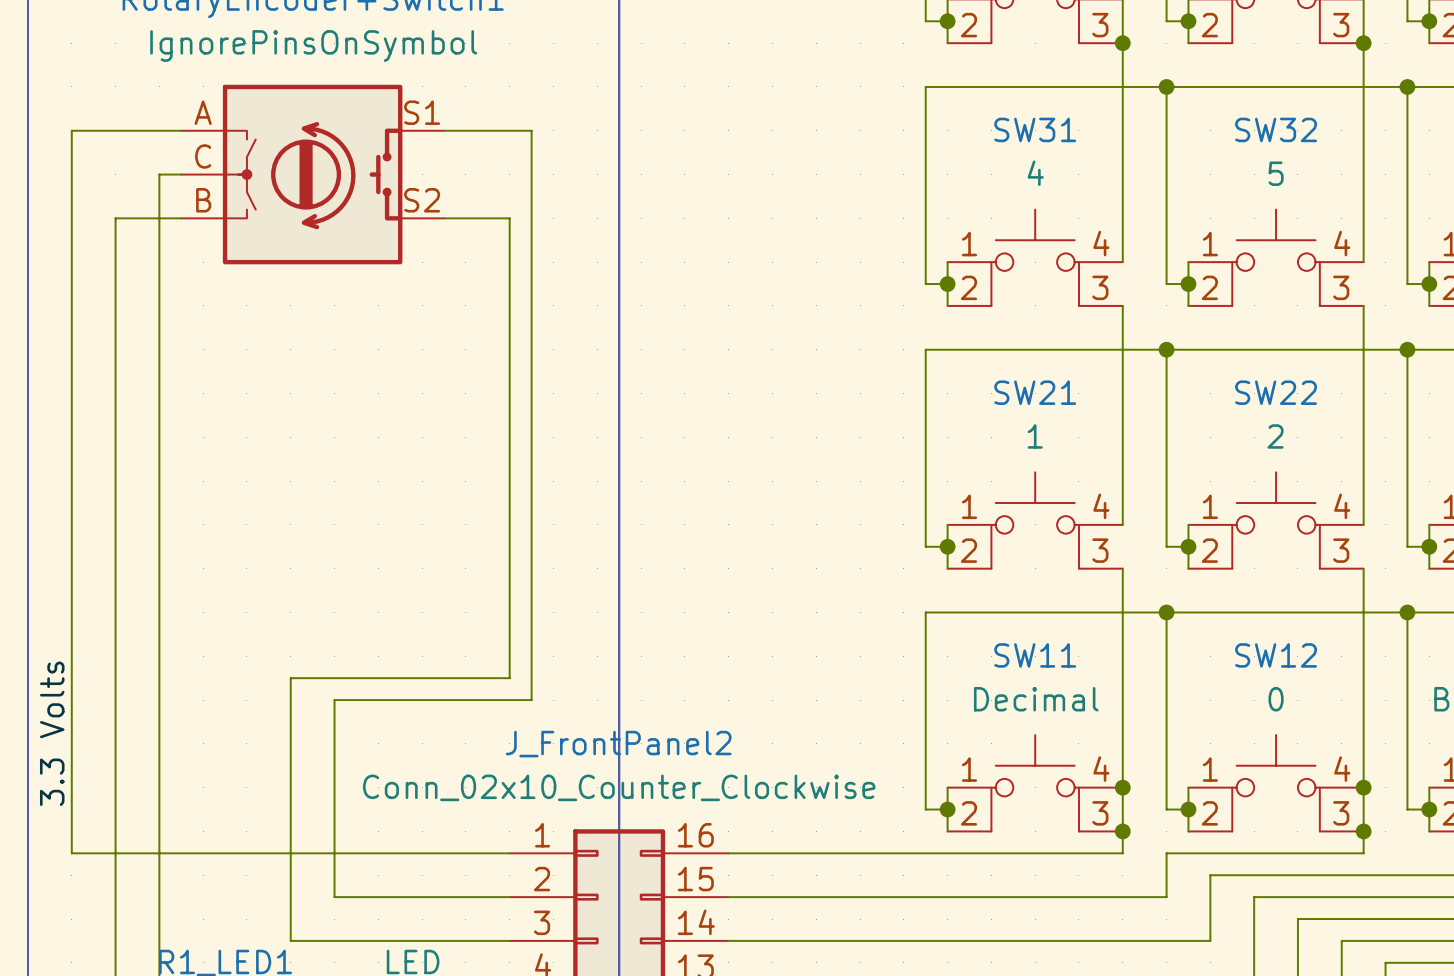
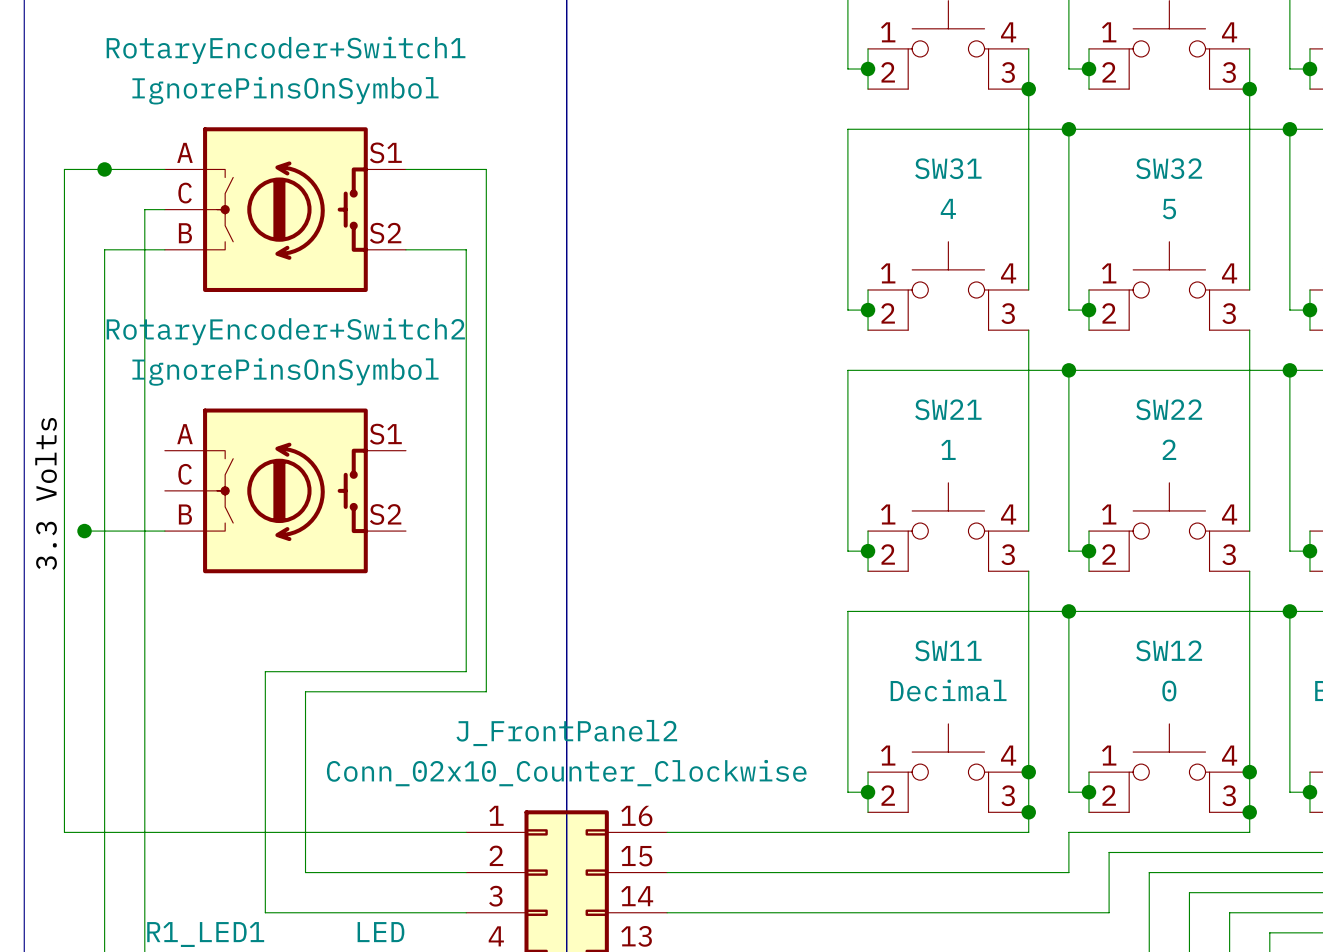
junction: none -> (104, 169)
RotaryEncoder+Switch2: none -> IgnorePinsOnSymbol (285, 490)
wire: none -> (84, 531) (164, 531)
junction: none -> (84, 531)
label position: 3.3 Volts (52, 733) -> 3.3 Volts (46, 493)

